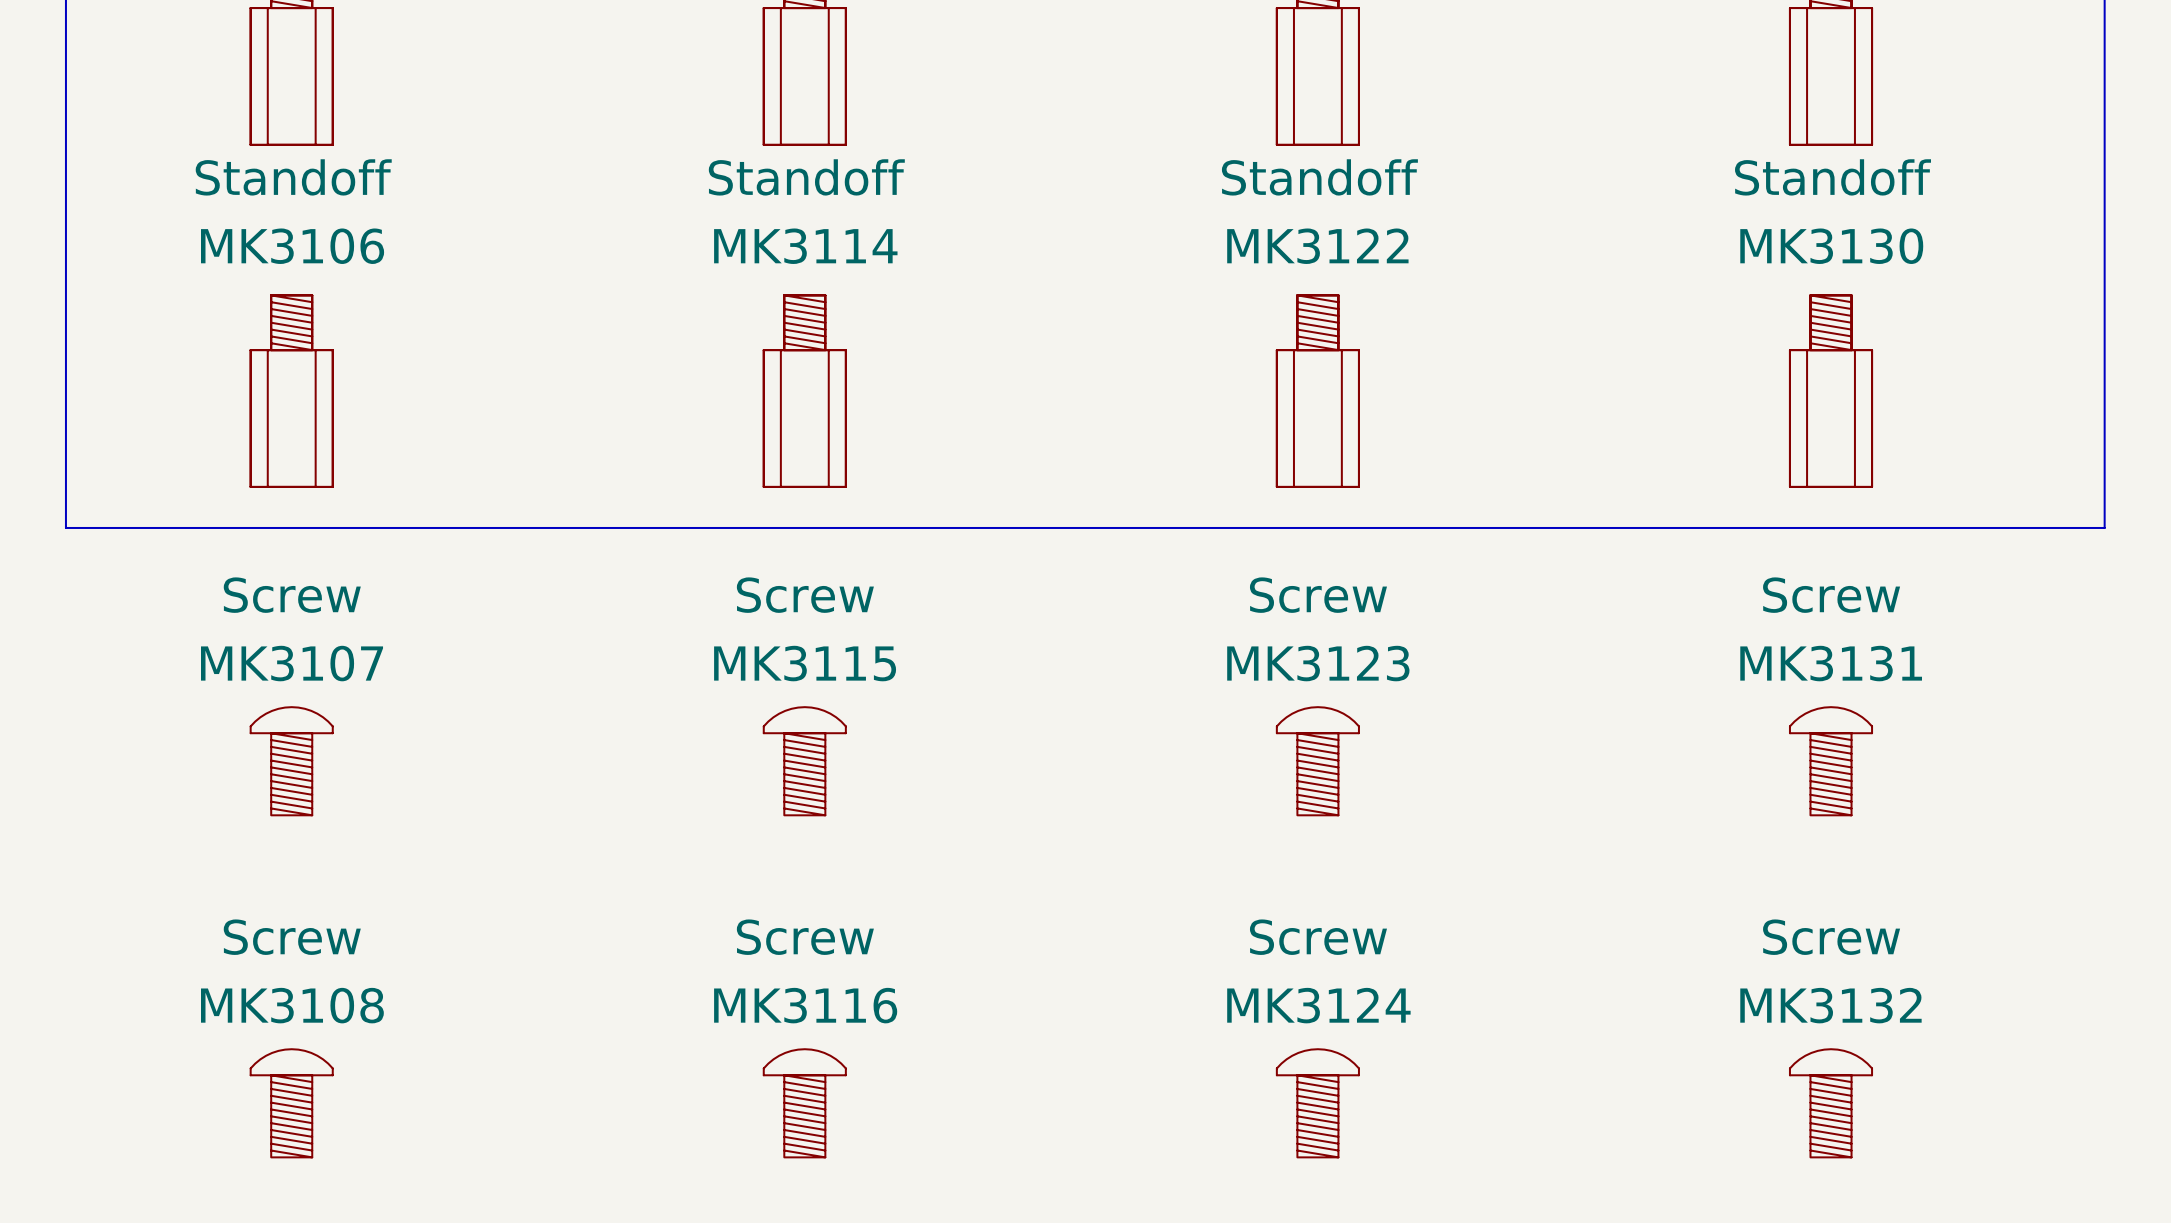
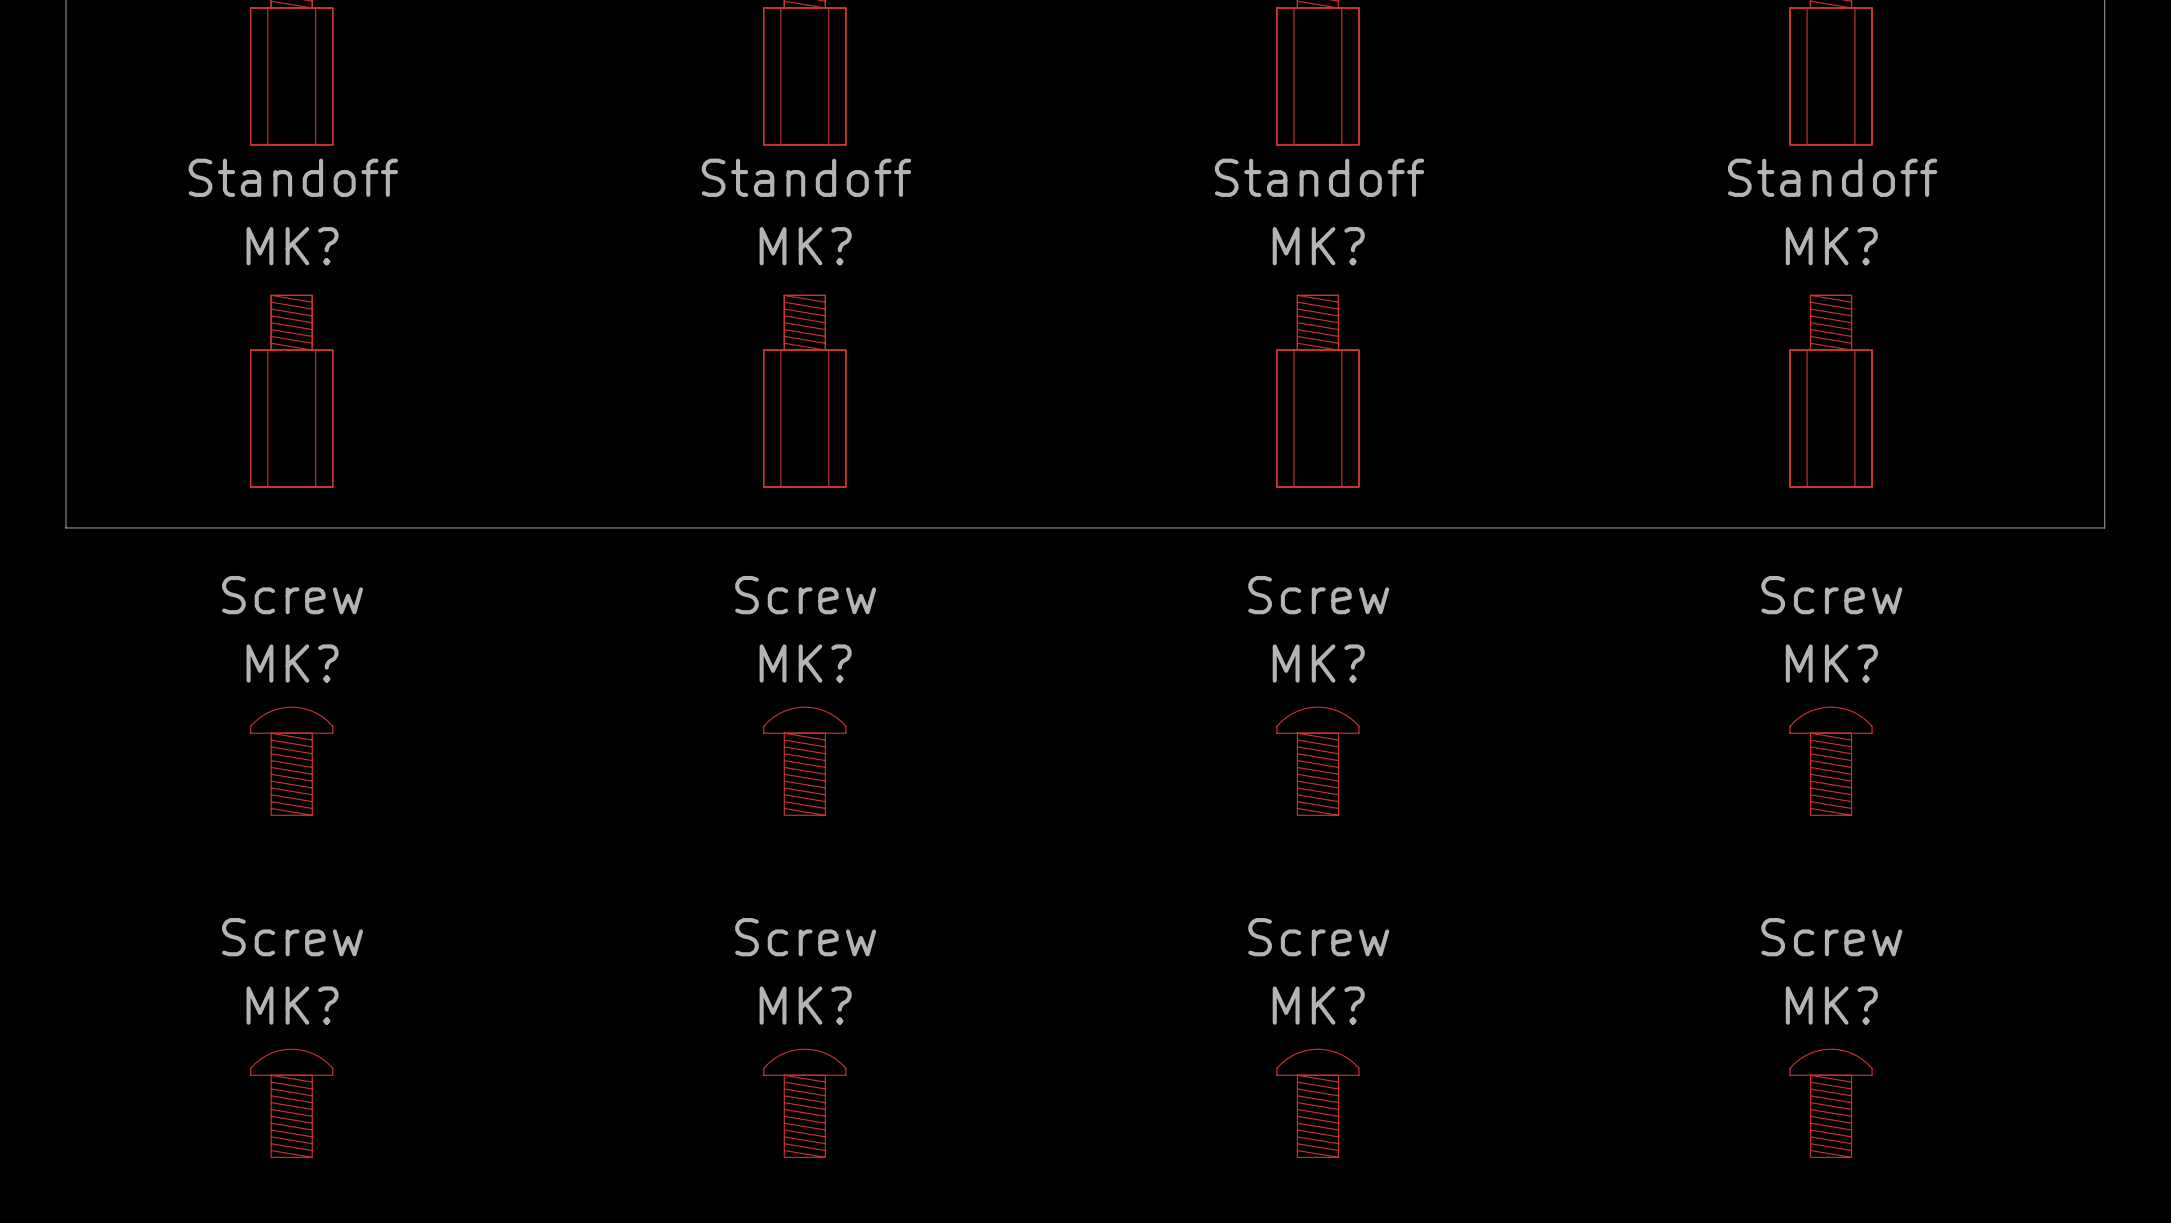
MK3106 name: MK3106 (292, 246) -> MK? (292, 246)
MK3114 name: MK3114 (805, 246) -> MK? (805, 246)
MK3122 name: MK3122 (1317, 246) -> MK? (1318, 246)
MK3130 name: MK3130 (1831, 246) -> MK? (1831, 246)
MK3107 name: MK3107 (292, 663) -> MK? (292, 663)
MK3115 name: MK3115 (805, 663) -> MK? (805, 663)
MK3123 name: MK3123 (1318, 663) -> MK? (1318, 663)
MK3131 name: MK3131 (1831, 663) -> MK? (1831, 663)
MK3108 name: MK3108 (292, 1005) -> MK? (292, 1005)
MK3116 name: MK3116 (805, 1005) -> MK? (805, 1005)
MK3124 name: MK3124 (1318, 1005) -> MK? (1318, 1005)
MK3132 name: MK3132 (1830, 1005) -> MK? (1831, 1005)

